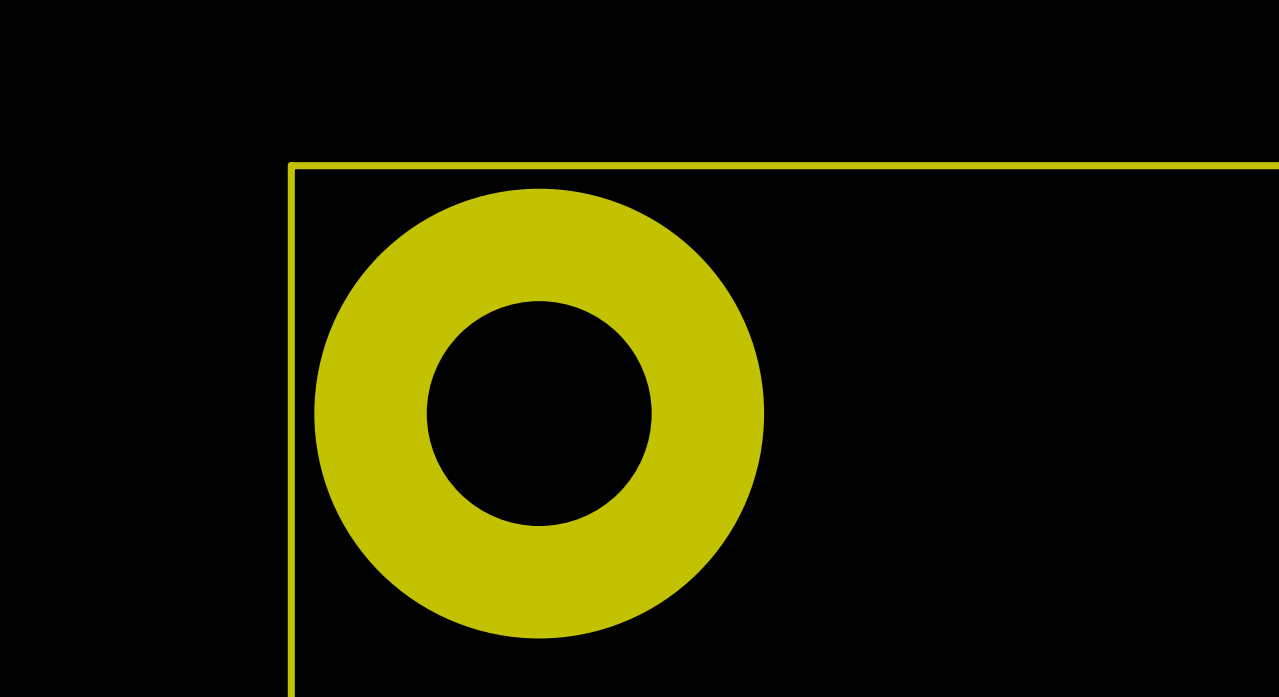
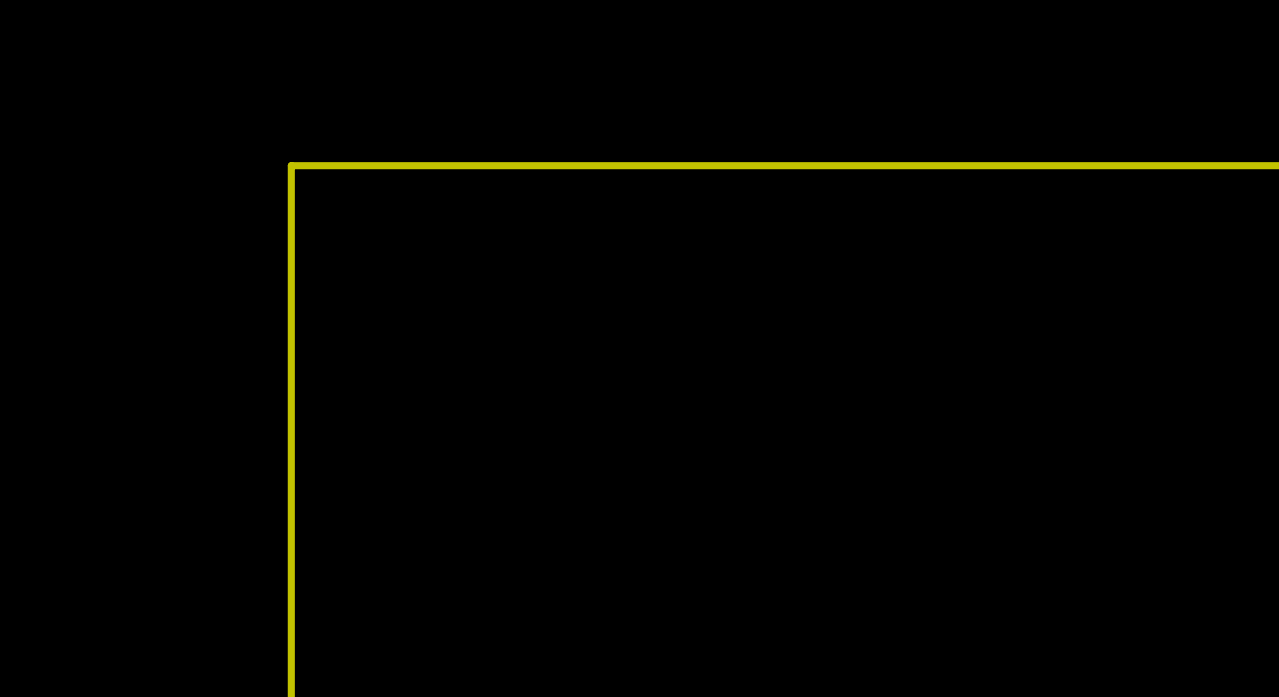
part: (539, 413) -> none

